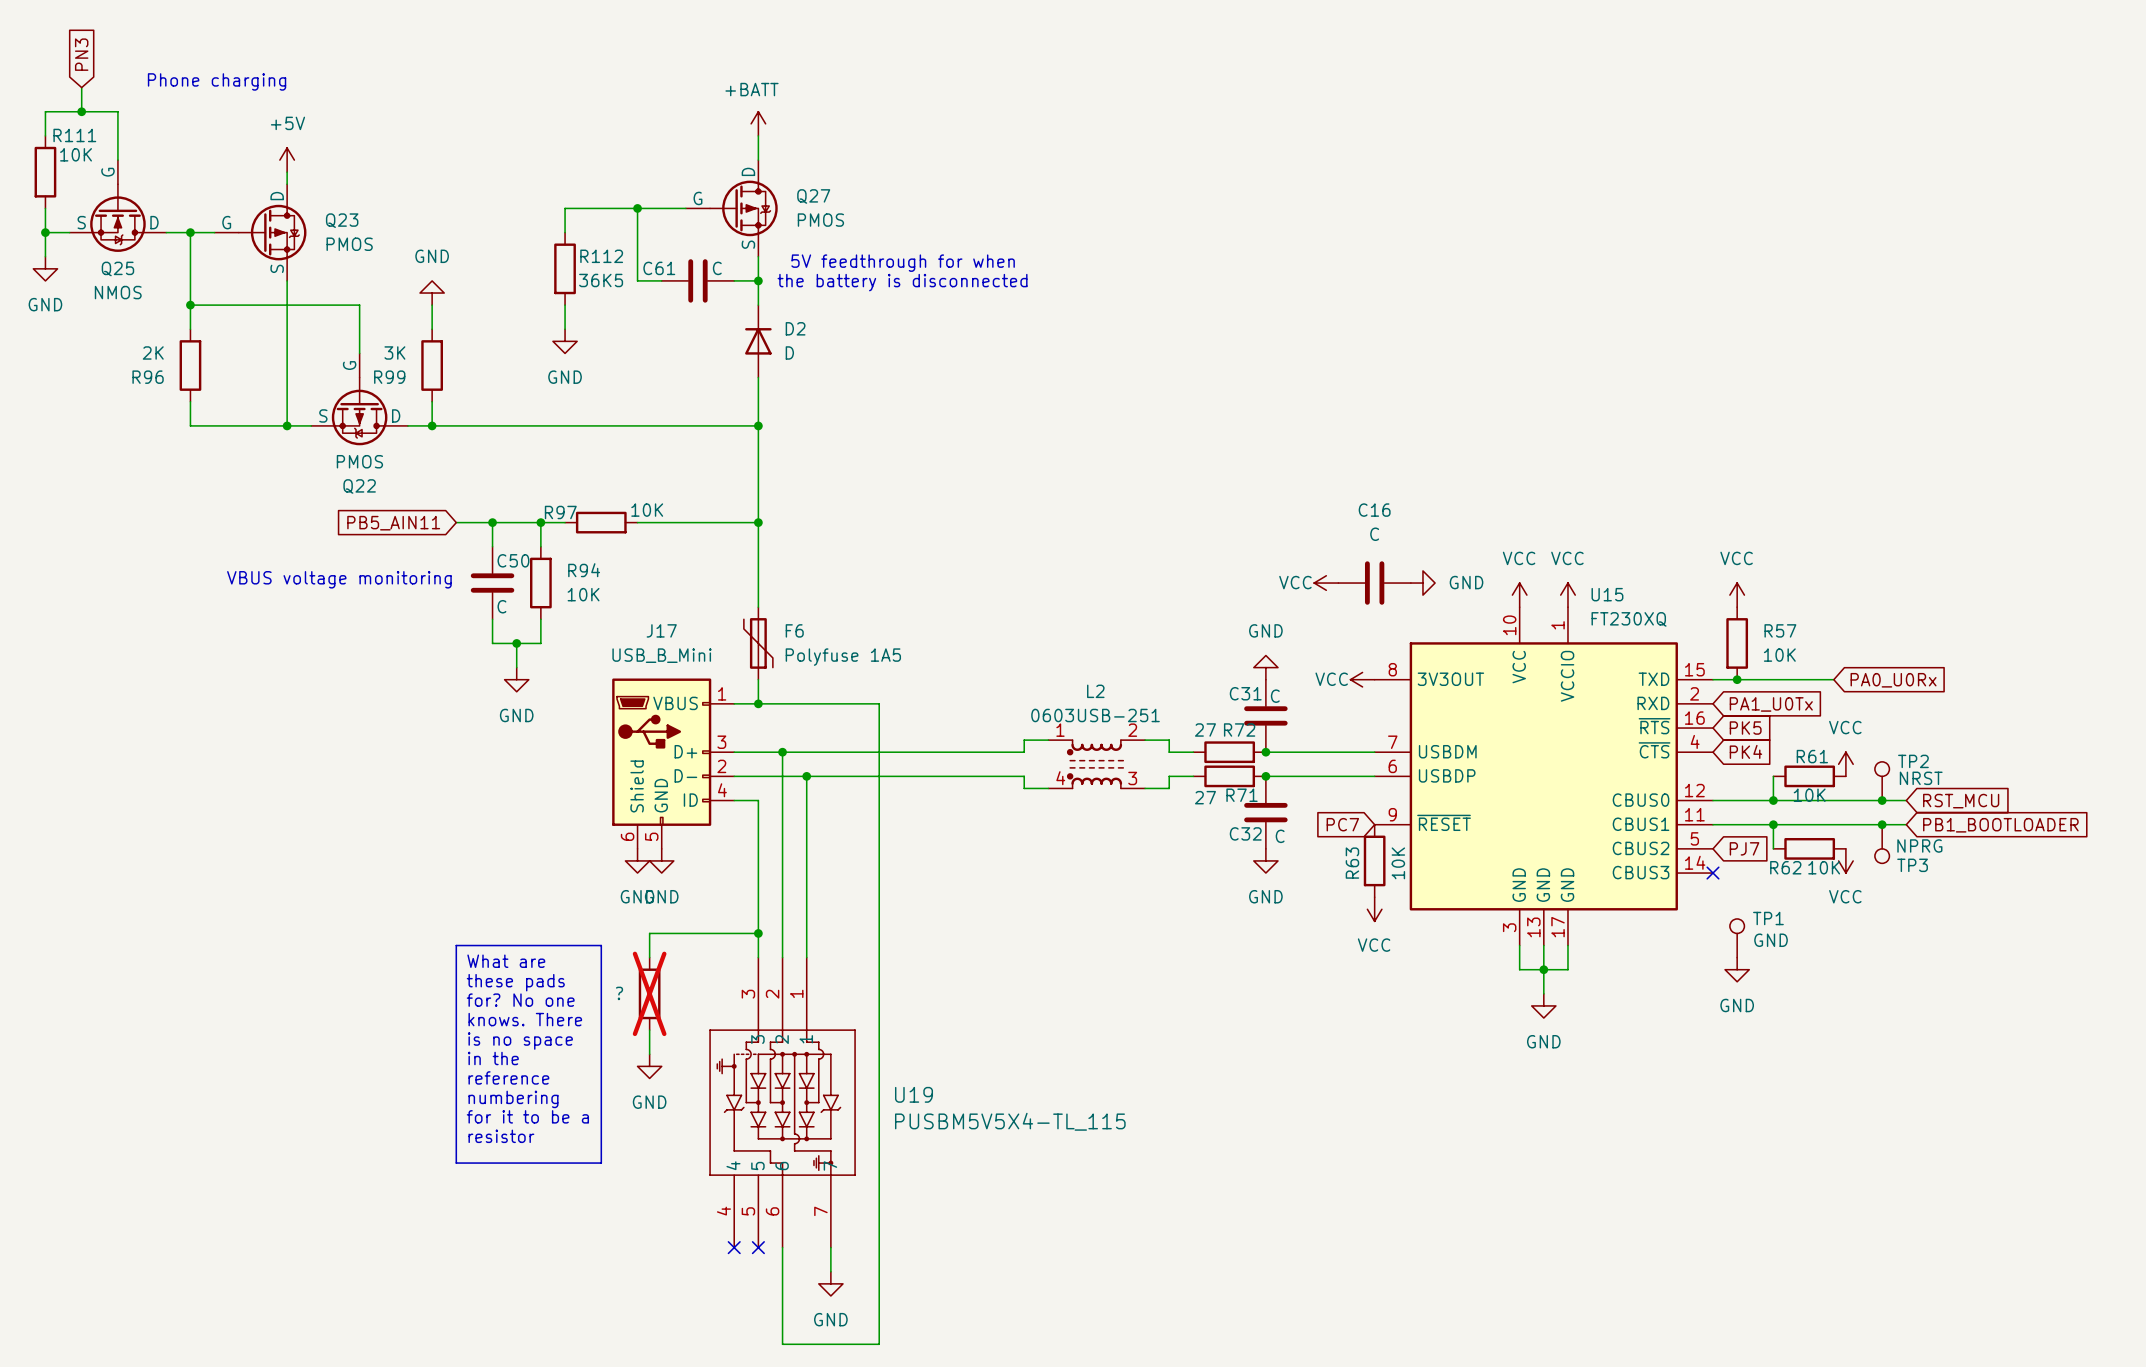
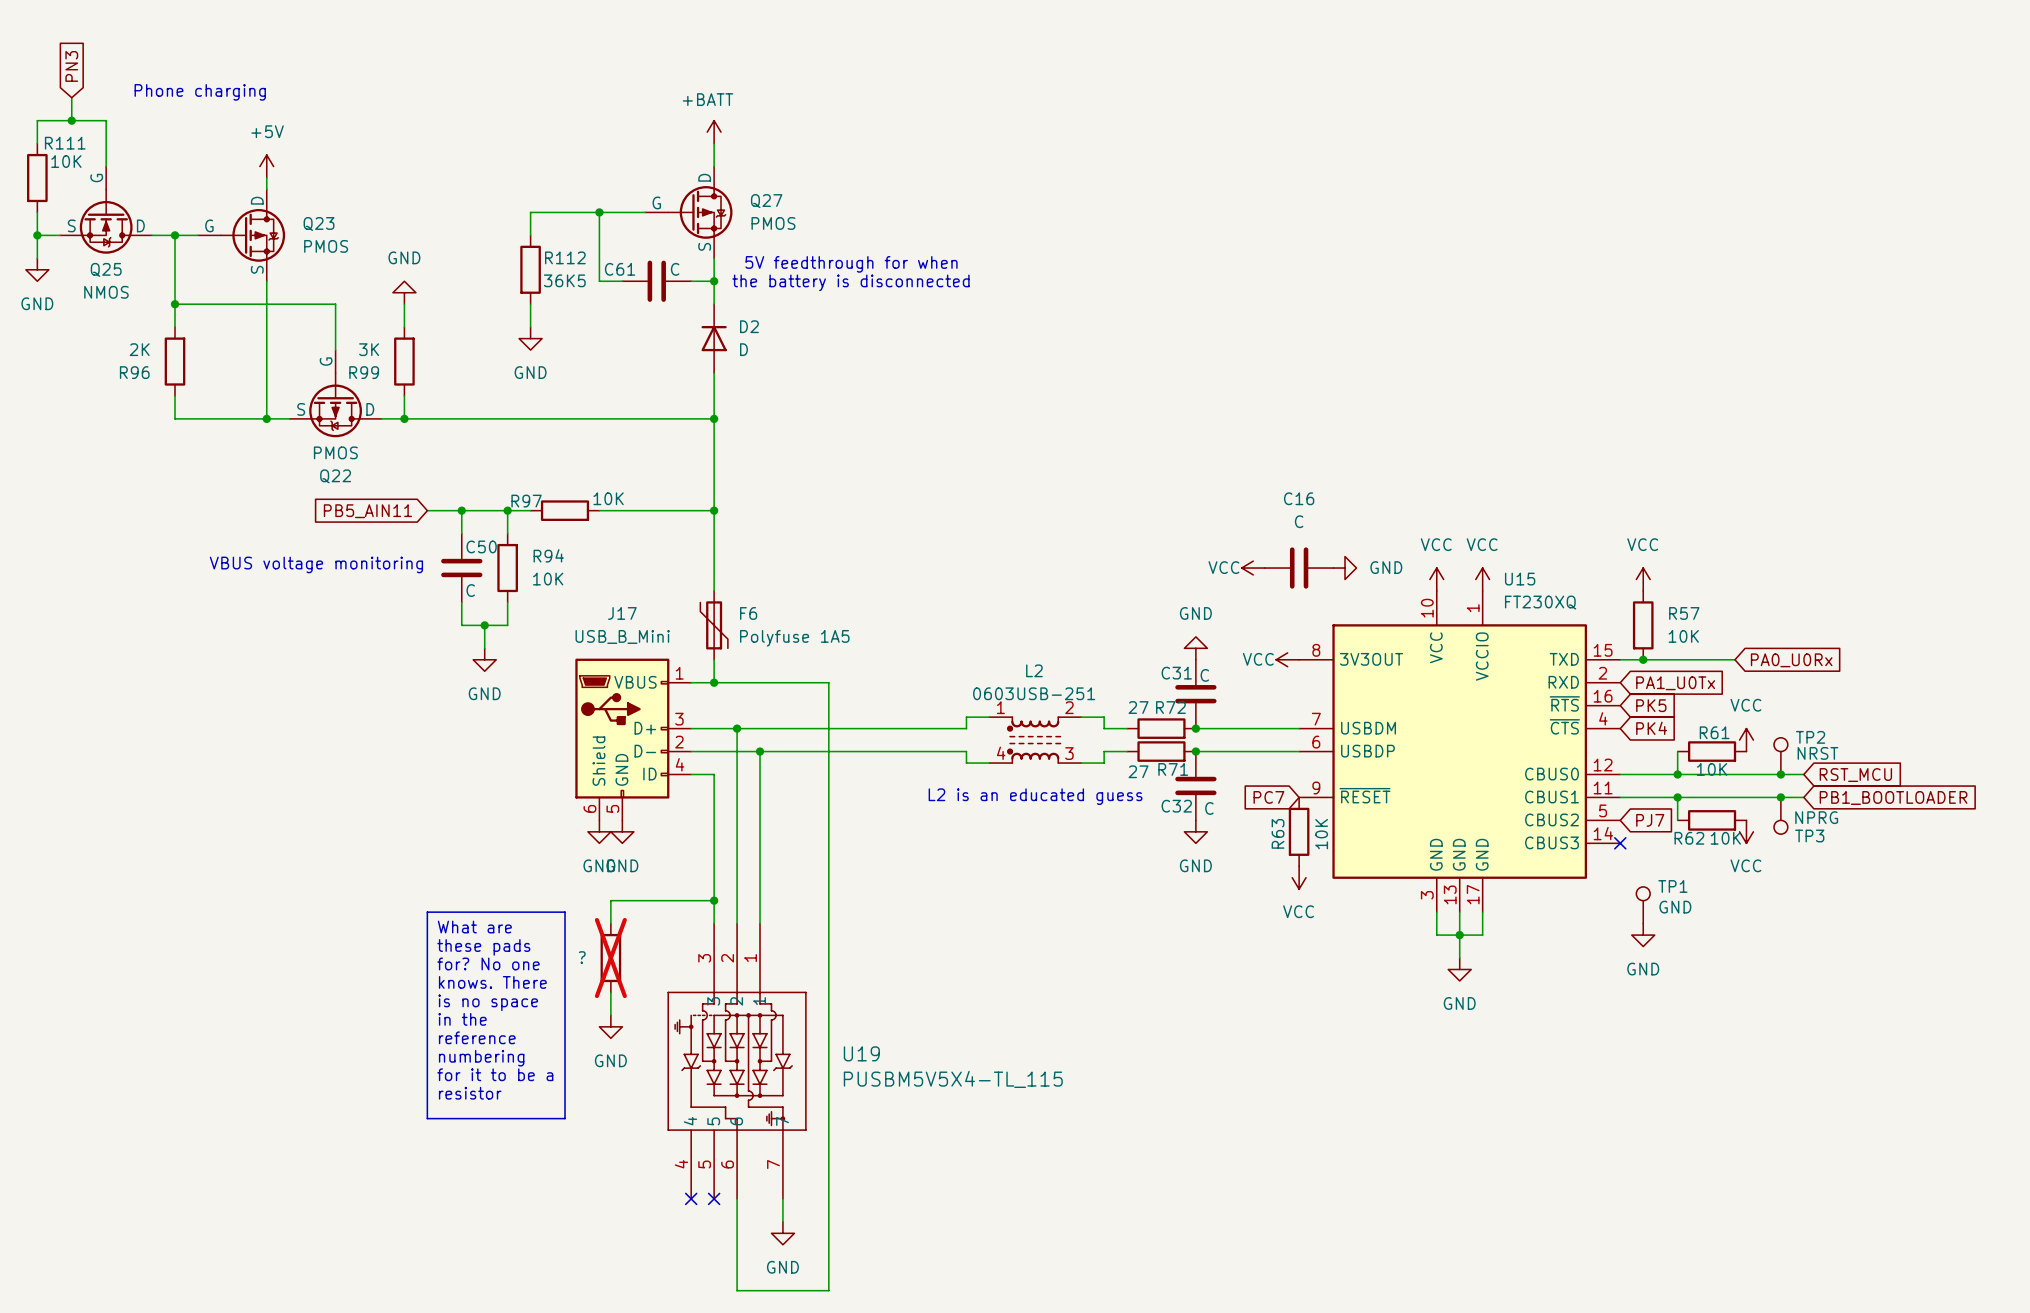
text: none -> L2 is an educated guess (1035, 796)

